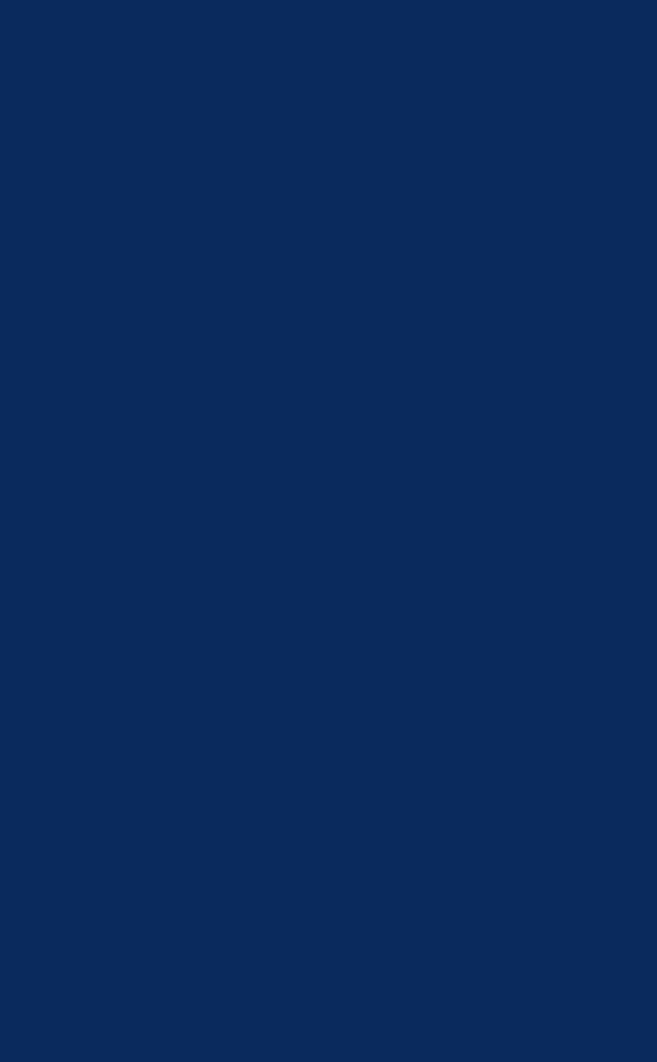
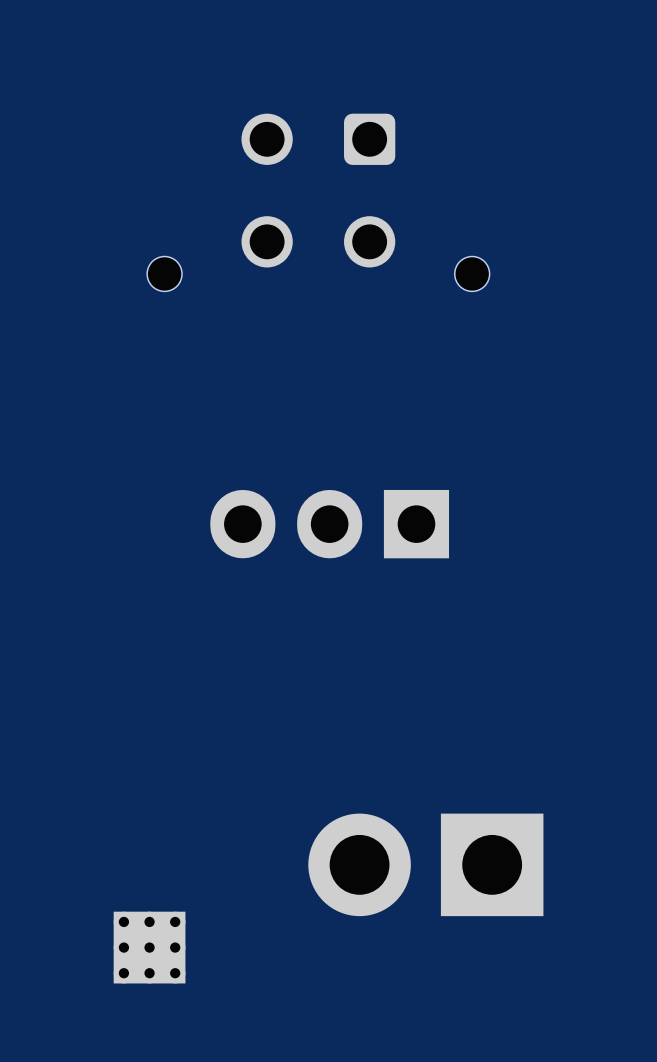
part: none -> (318, 202)
part: none -> (329, 524)
part: none -> (425, 864)
part: none -> (149, 947)

